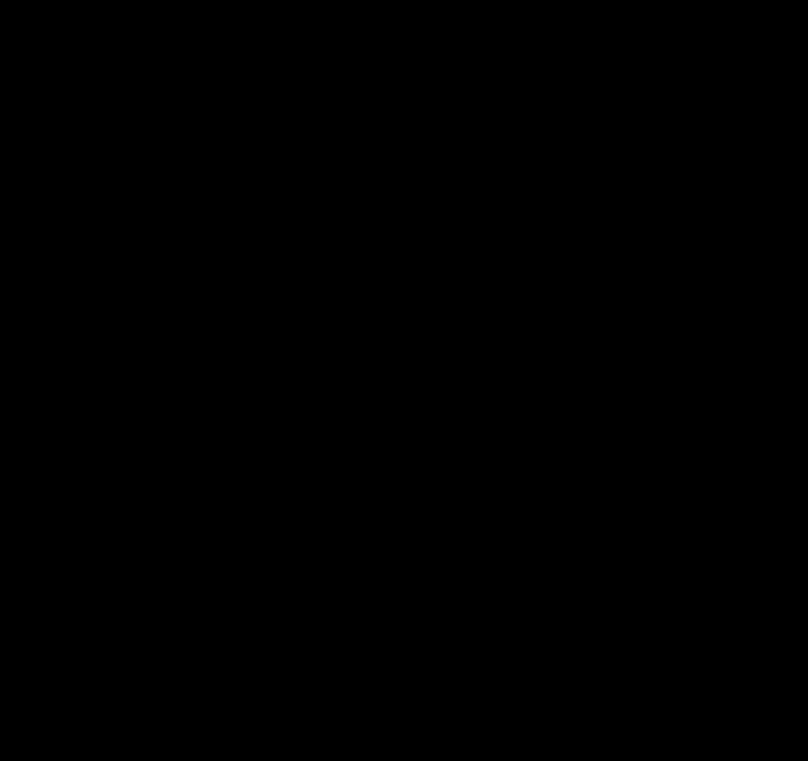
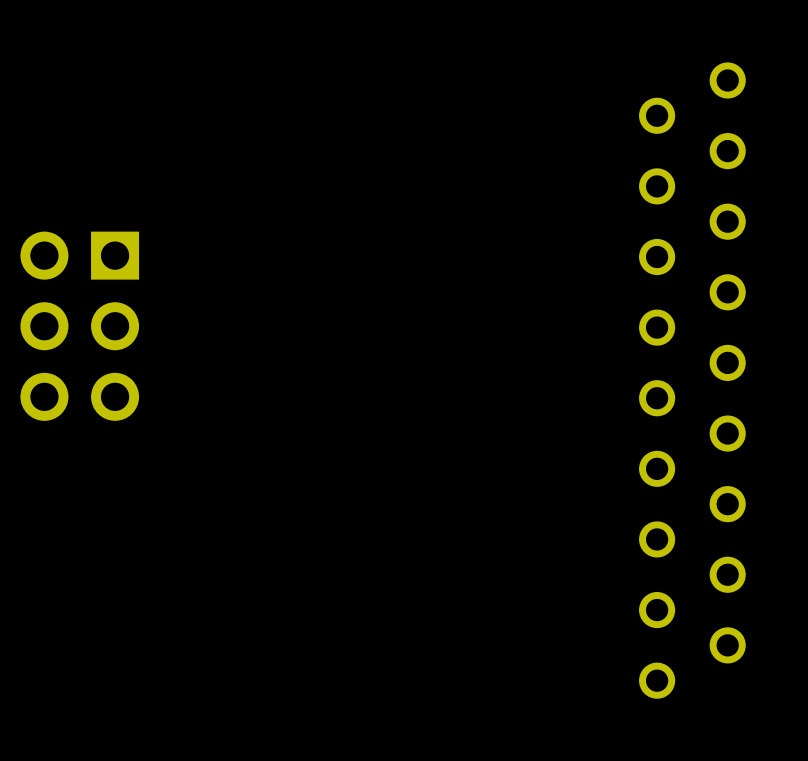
part: none -> (79, 326)
part: none -> (692, 380)

